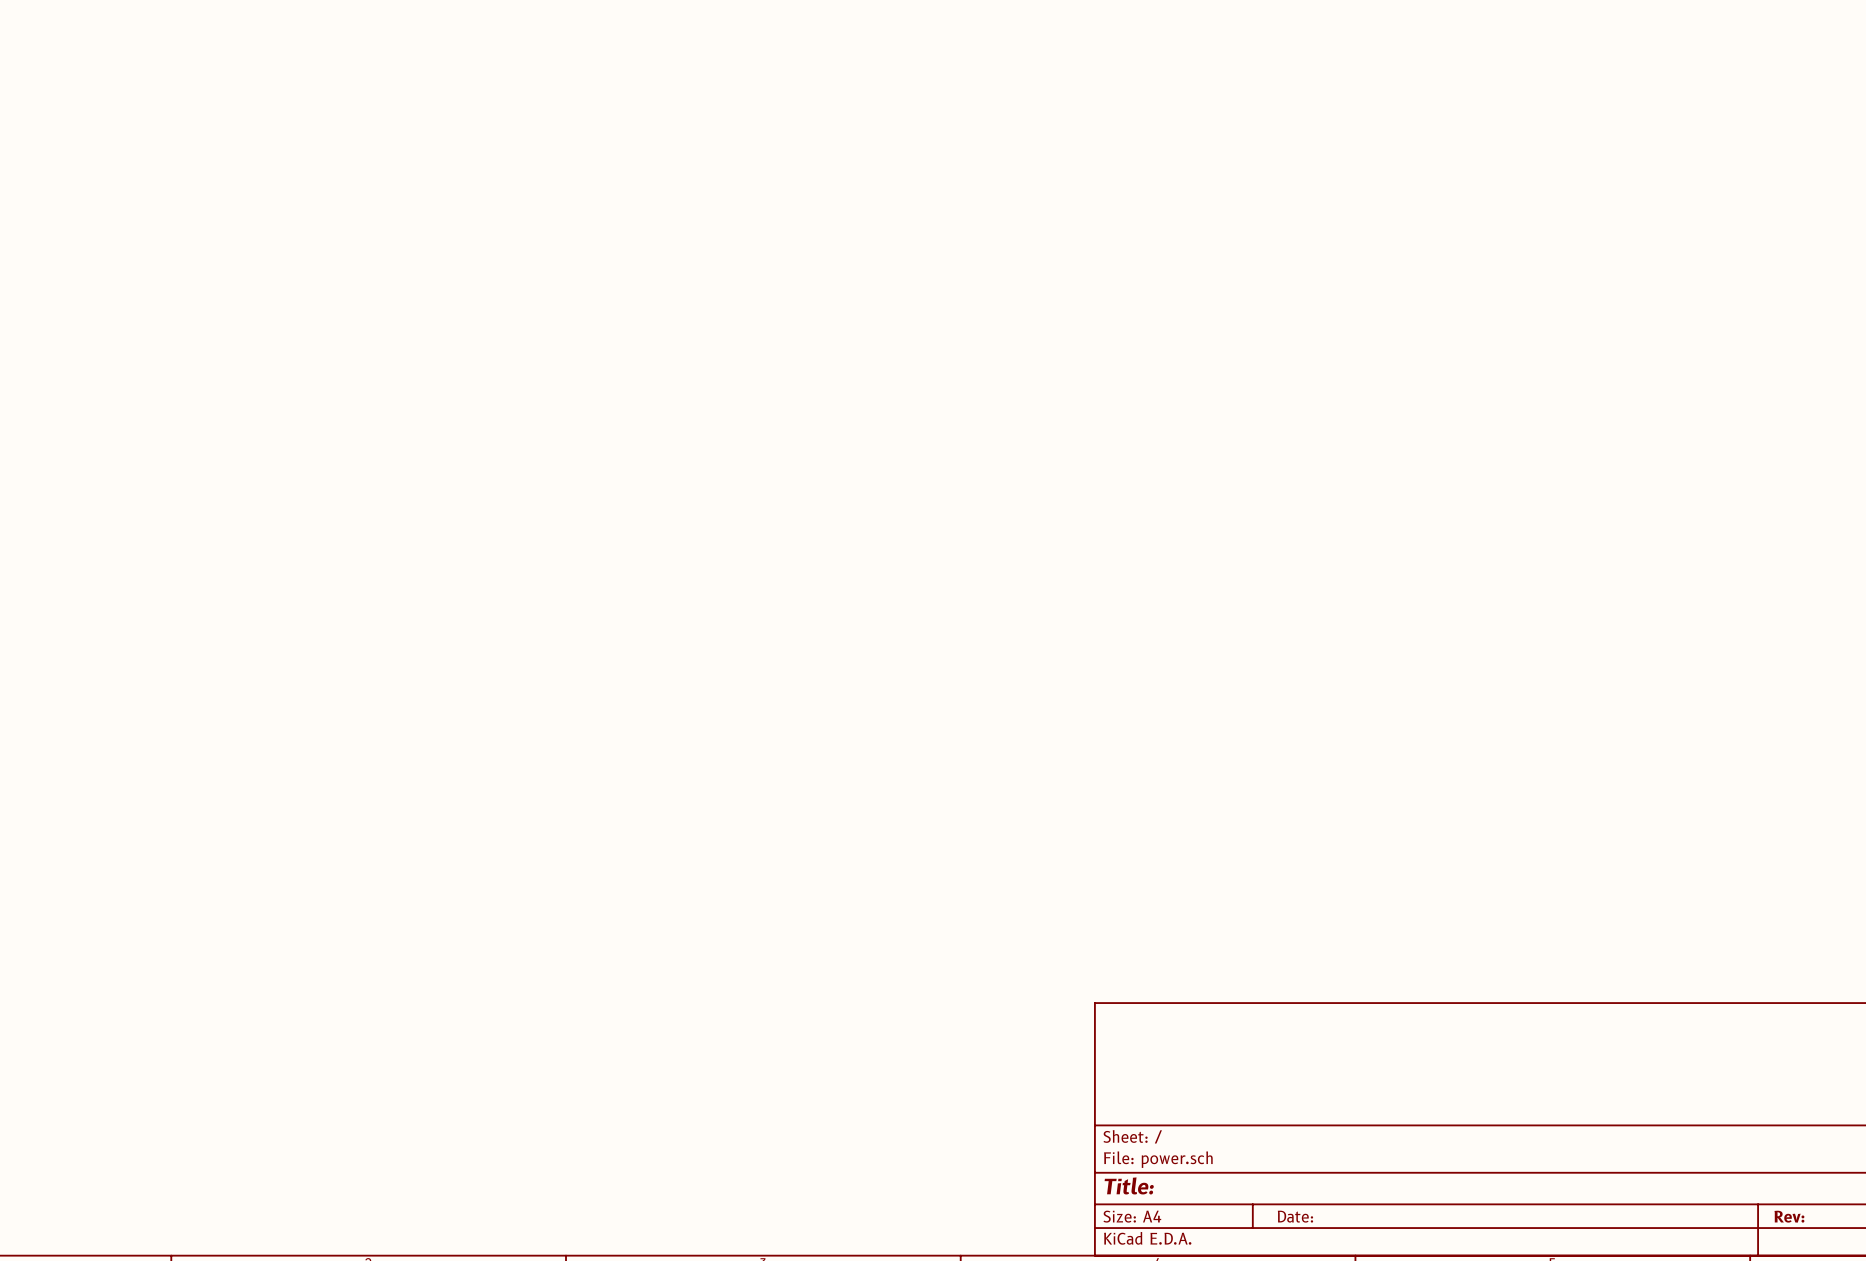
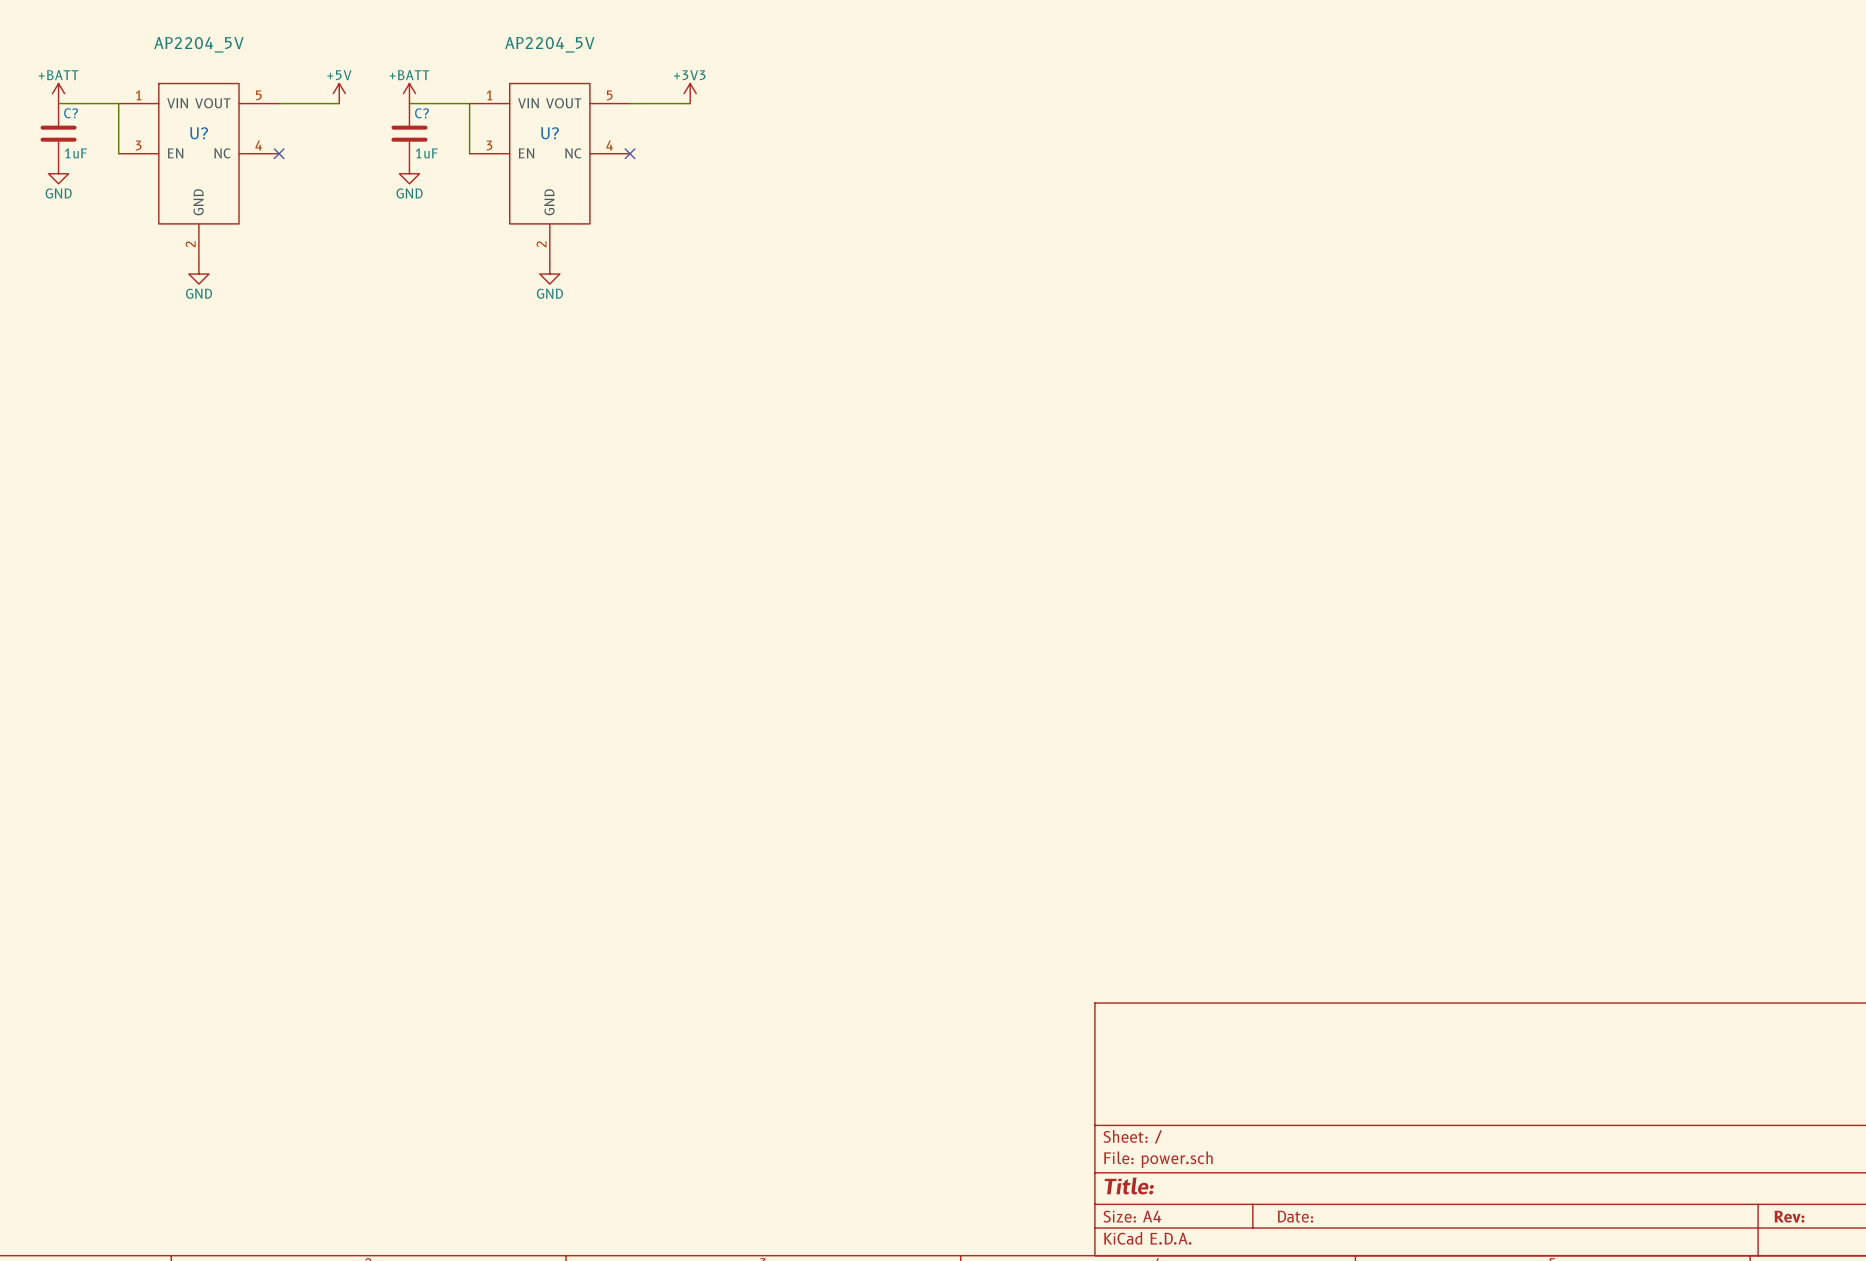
power symbol: none -> +BATT (58, 93)
power symbol: none -> +5V (339, 93)
power symbol: none -> +BATT (409, 93)
power symbol: none -> +3V3 (690, 93)
wire: none -> (58, 103) (118, 103) (118, 153)
wire: none -> (279, 103) (339, 103)
wire: none -> (409, 103) (469, 103) (469, 153)
wire: none -> (630, 103) (690, 103)
C?: none -> 1uF (58, 133)
C?: none -> 1uF (409, 133)
no-connect mark: none -> (279, 153)
no-connect mark: none -> (630, 153)
power symbol: none -> GND (58, 173)
U?: none -> AP2204_5V (198, 173)
power symbol: none -> GND (409, 173)
U?: none -> AP2204_5V (549, 173)
power symbol: none -> GND (198, 274)
power symbol: none -> GND (549, 274)

